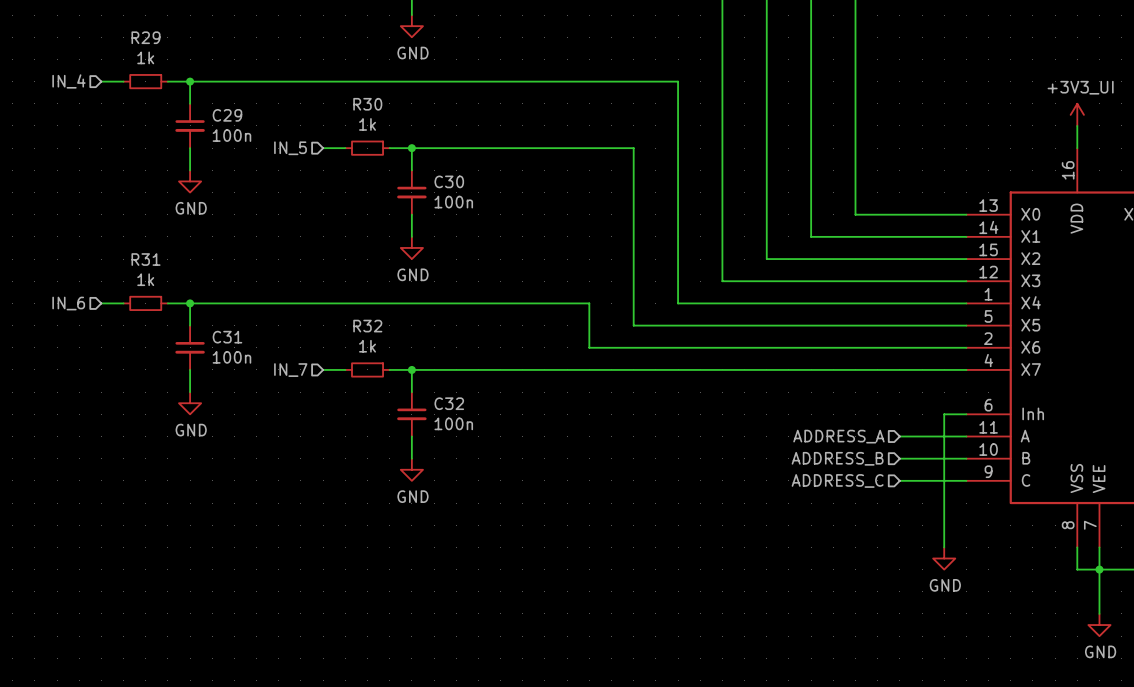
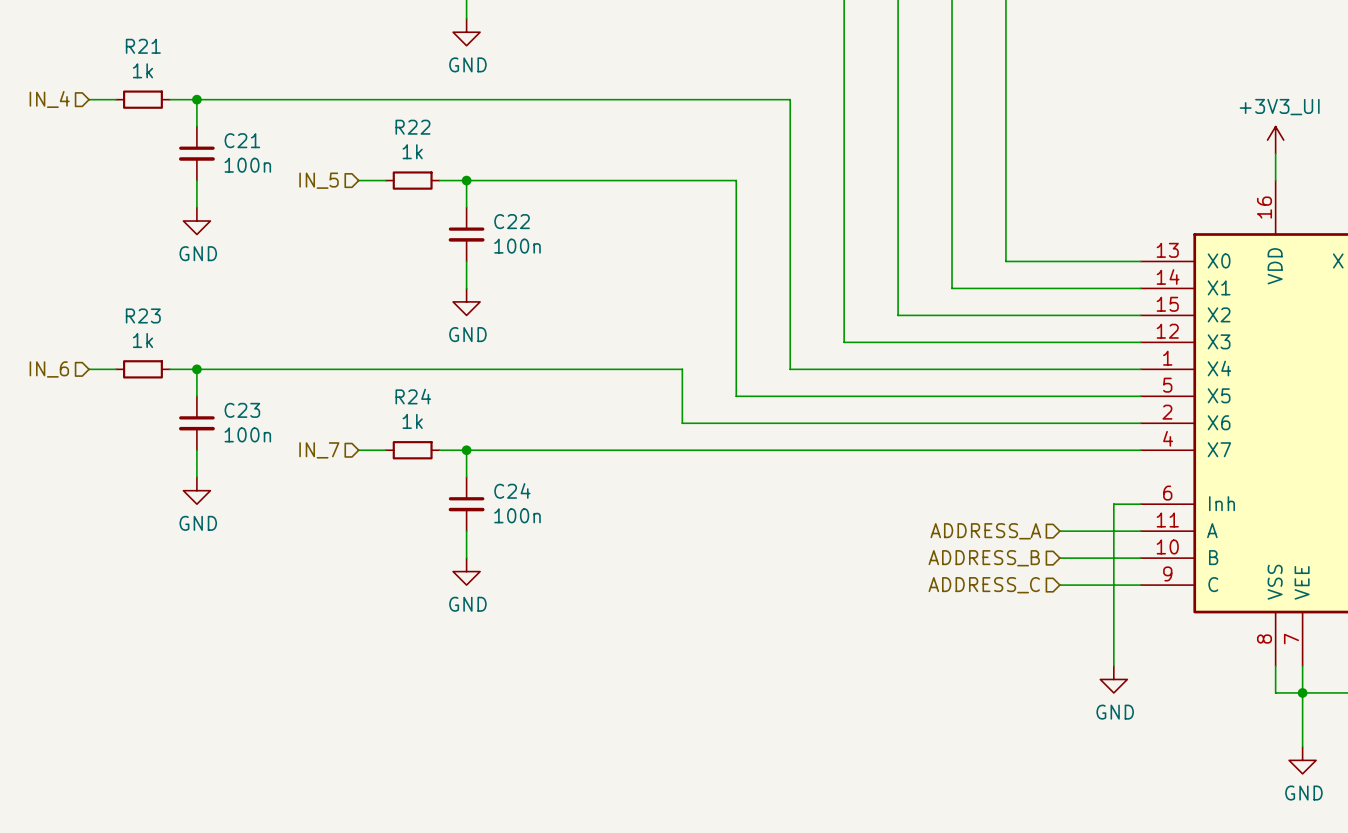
R29 name: R29 (145, 37) -> R21 (143, 46)
R30 name: R30 (367, 104) -> R22 (412, 127)
C29 name: C29 (227, 115) -> C21 (242, 140)
C30 name: C30 (449, 181) -> C22 (512, 221)
R31 name: R31 (145, 259) -> R23 (143, 315)
R32 name: R32 (367, 326) -> R24 (413, 396)
C31 name: C31 (227, 337) -> C23 (242, 410)
C32 name: C32 (449, 403) -> C24 (512, 490)

